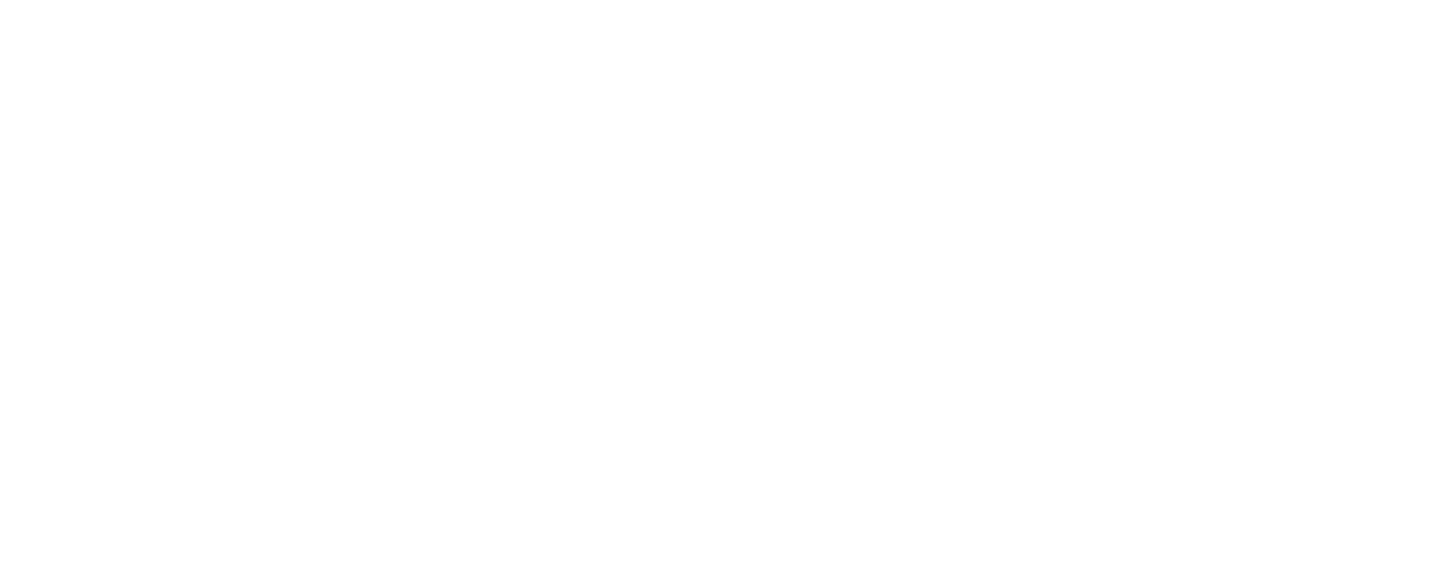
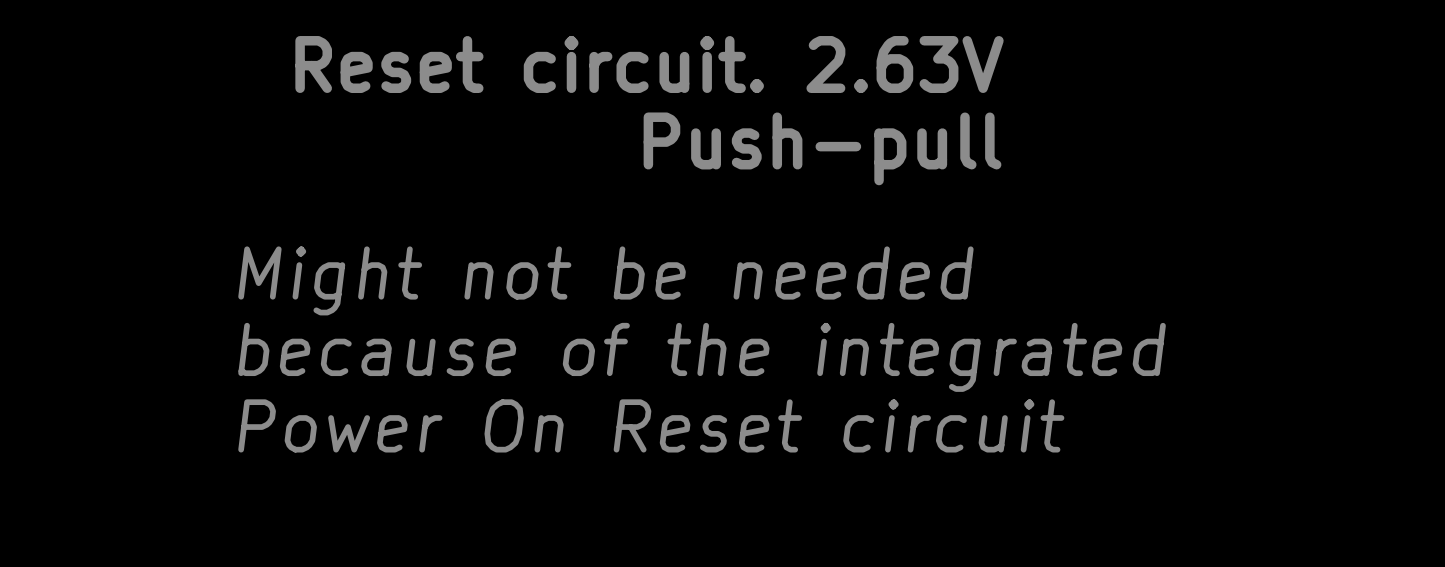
text: none -> Reset circuit. 2.63V (649, 64)
text: none -> Push-pull (822, 148)
text: none -> Might not be needed (605, 280)
text: none -> because of the integrated (702, 357)
text: none -> Power On Reset circuit (651, 425)

